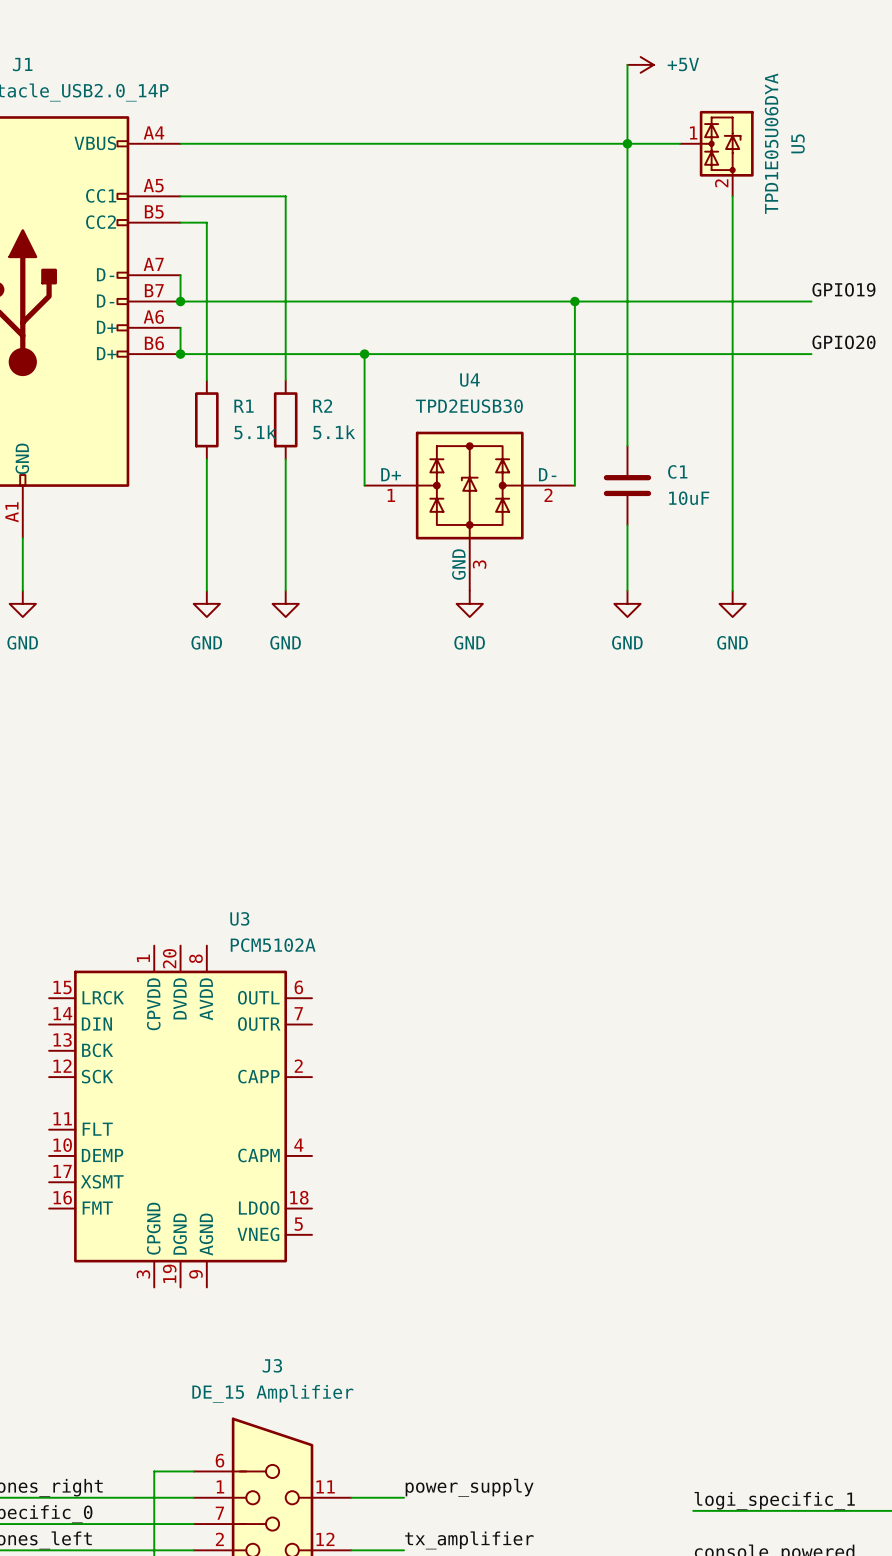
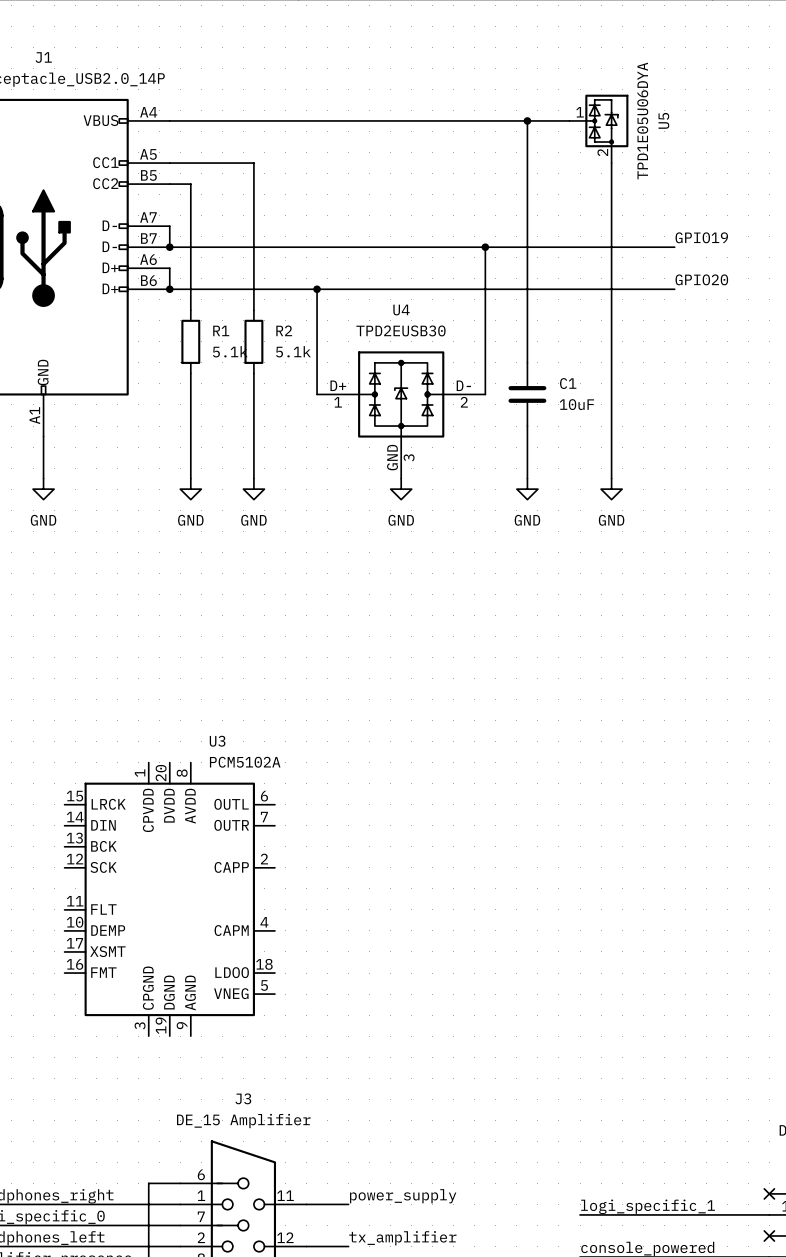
wire: (627, 64) (627, 143) -> none
power symbol: +5V (640, 64) -> none

